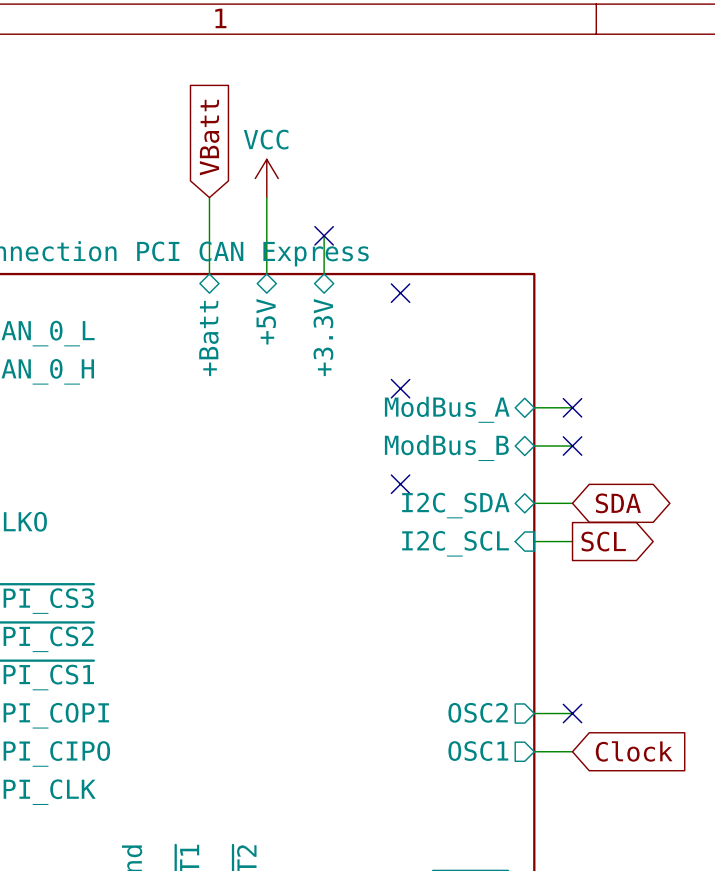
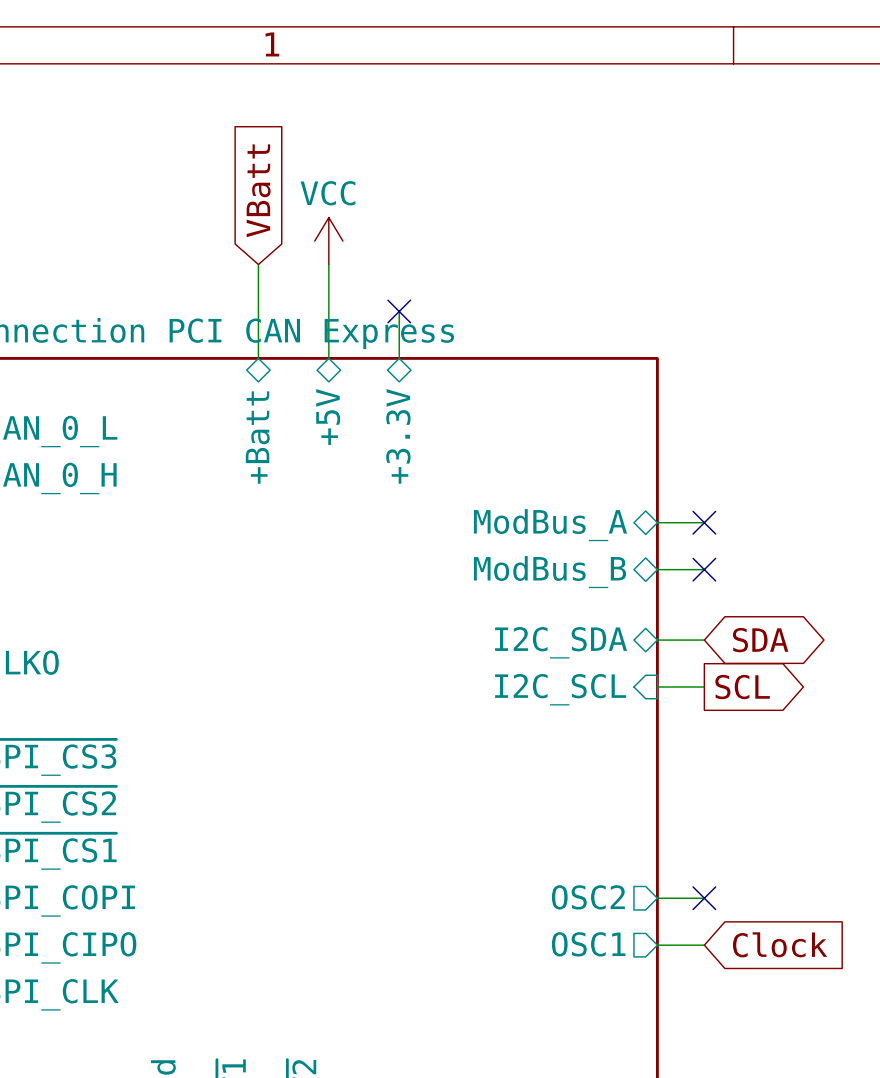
no-connect mark: (400, 293) -> none
no-connect mark: (400, 388) -> none
no-connect mark: (400, 484) -> none

